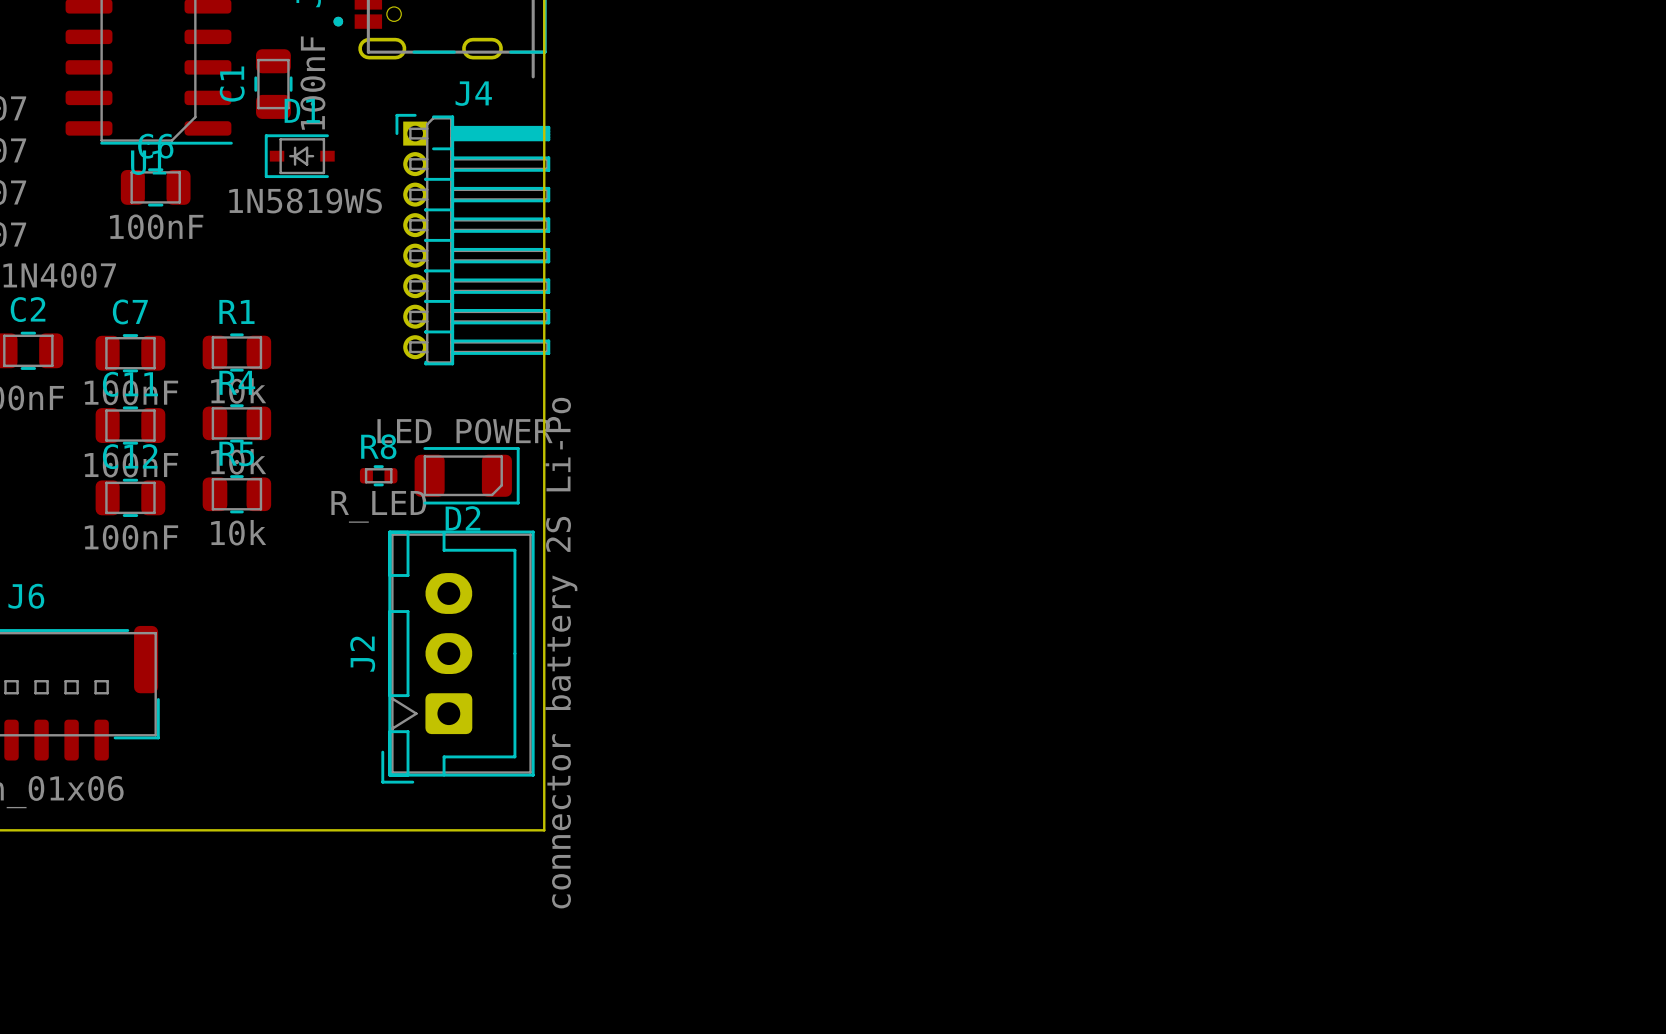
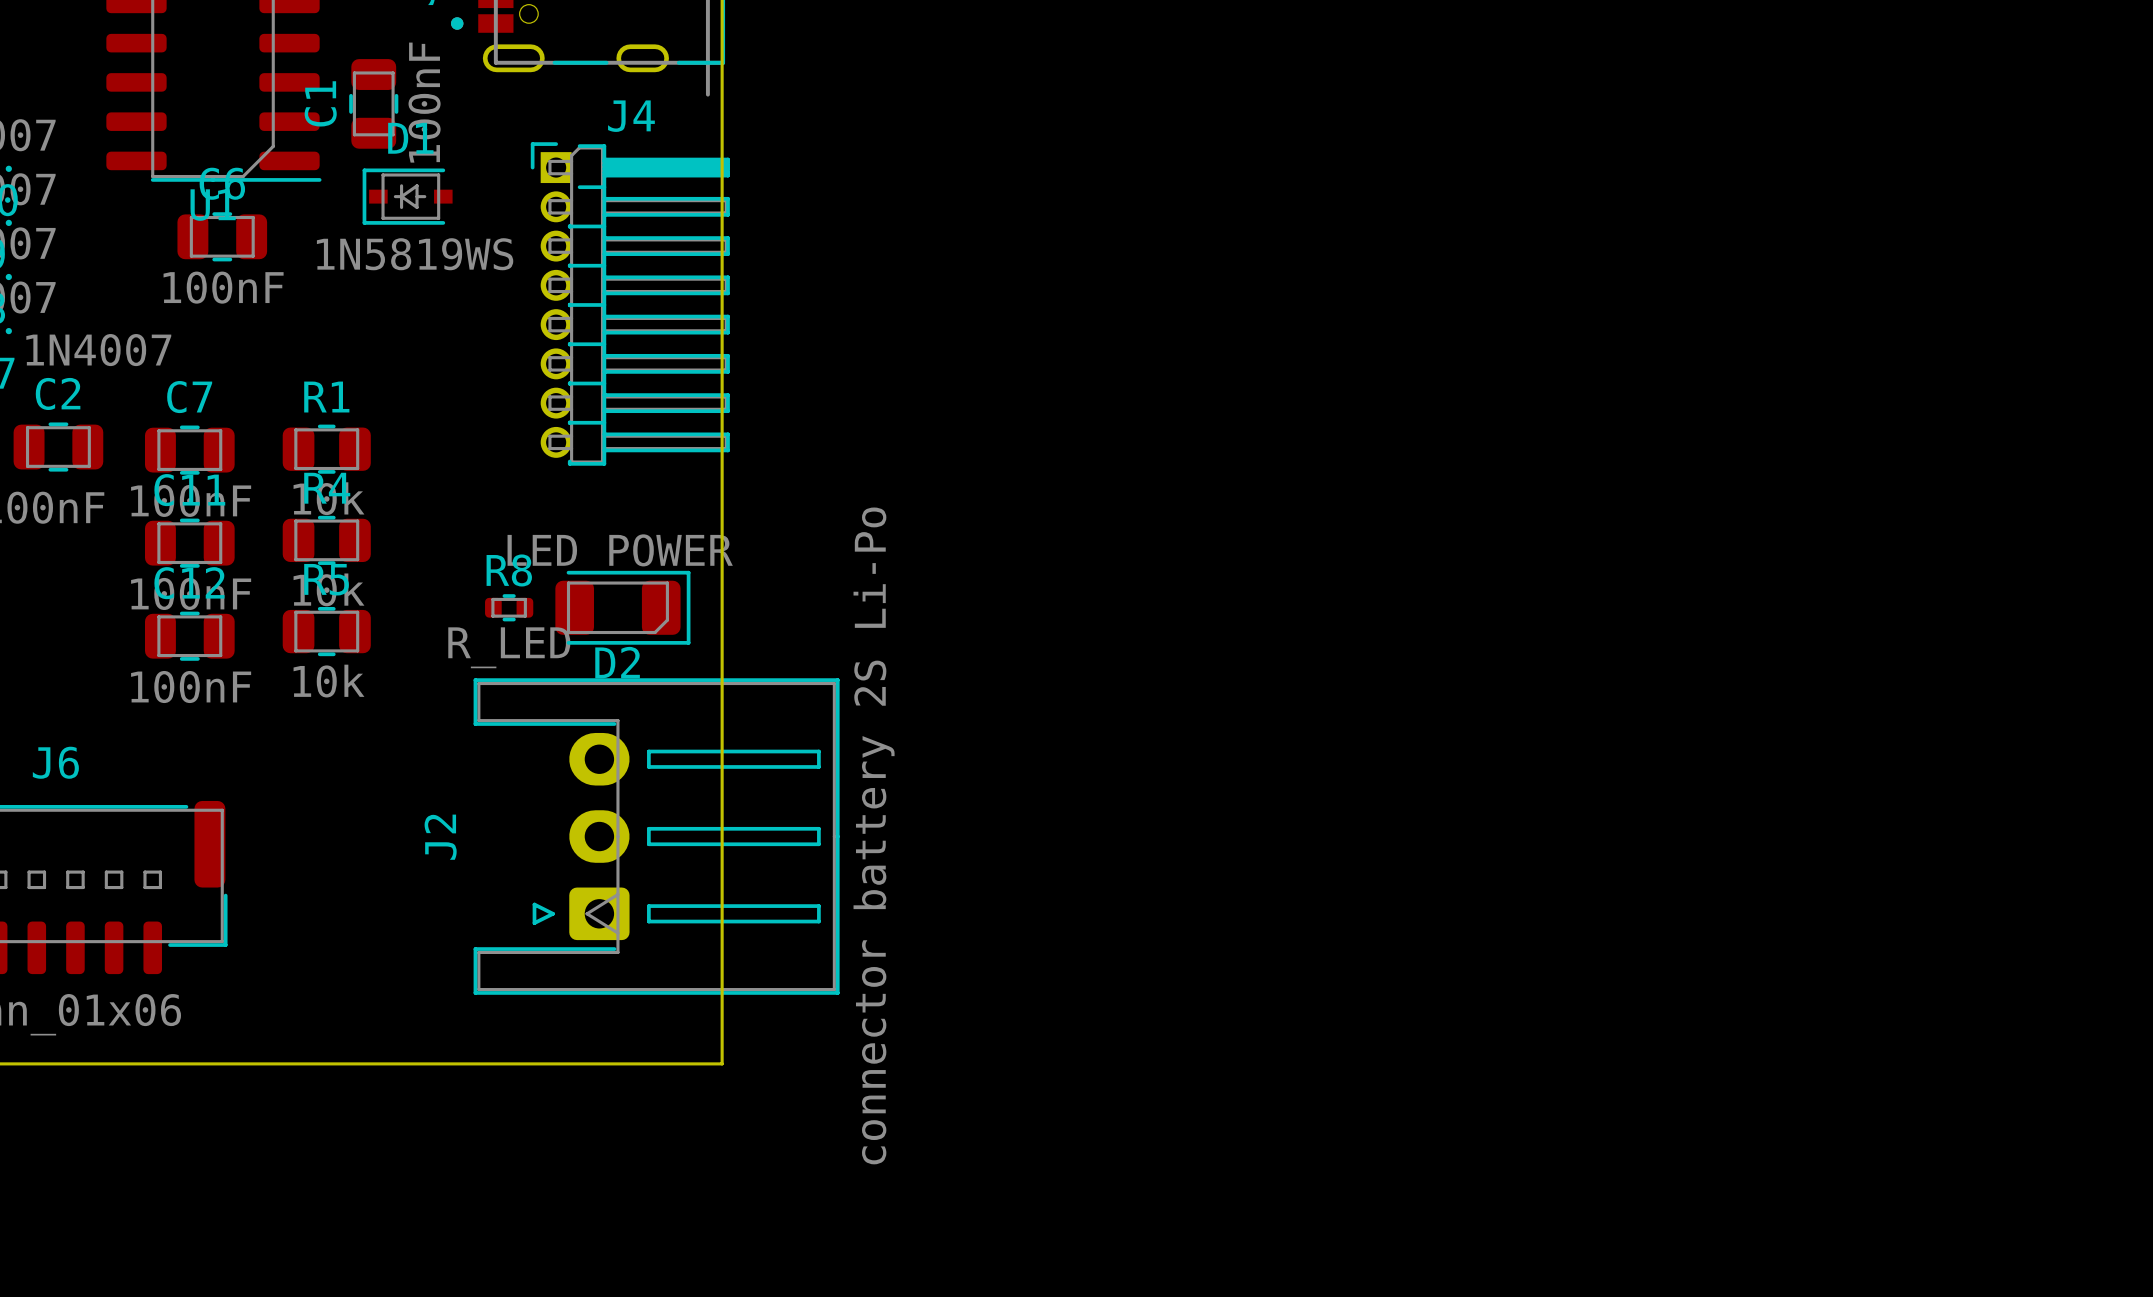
J2 footprint: [381, 530, 535, 784] -> [473, 678, 840, 995]
J2 value position: connector battery 2S Li-Po (561, 653) -> connector battery 2S Li-Po (874, 835)
J2 name position: J2 (362, 654) -> J2 (440, 837)

